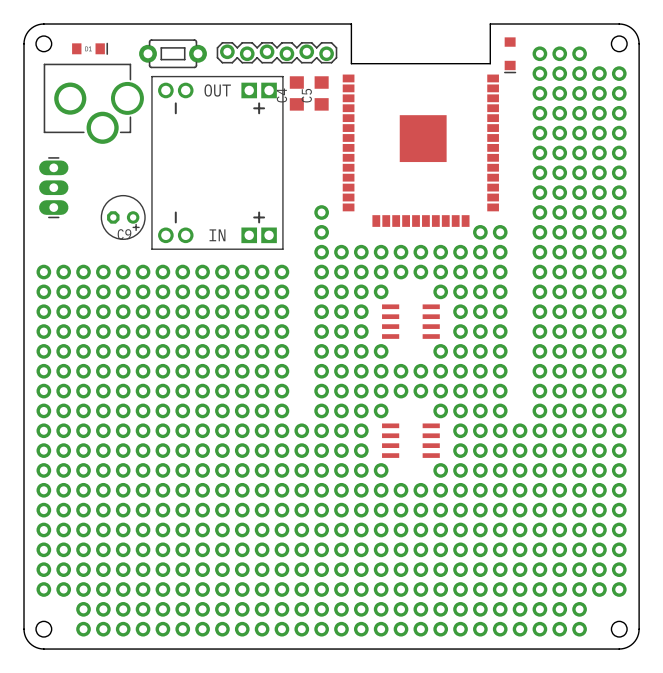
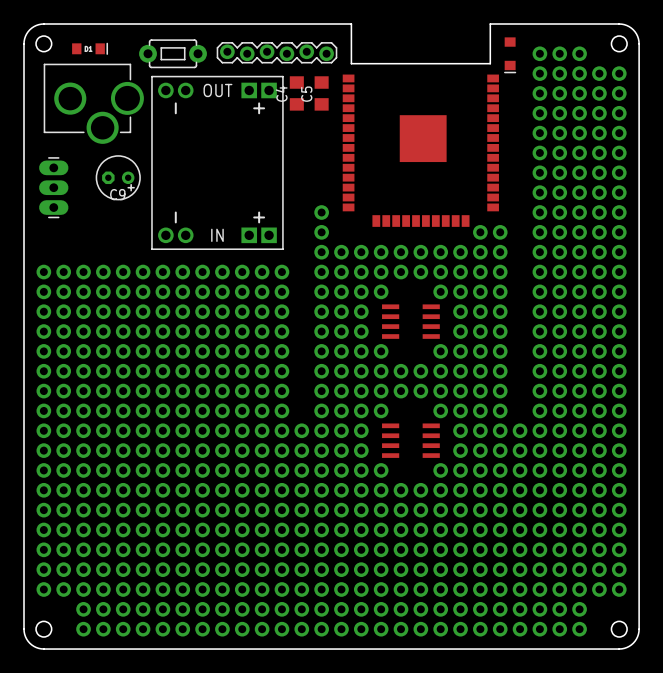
C9 position: (123, 217) -> (118, 177)

